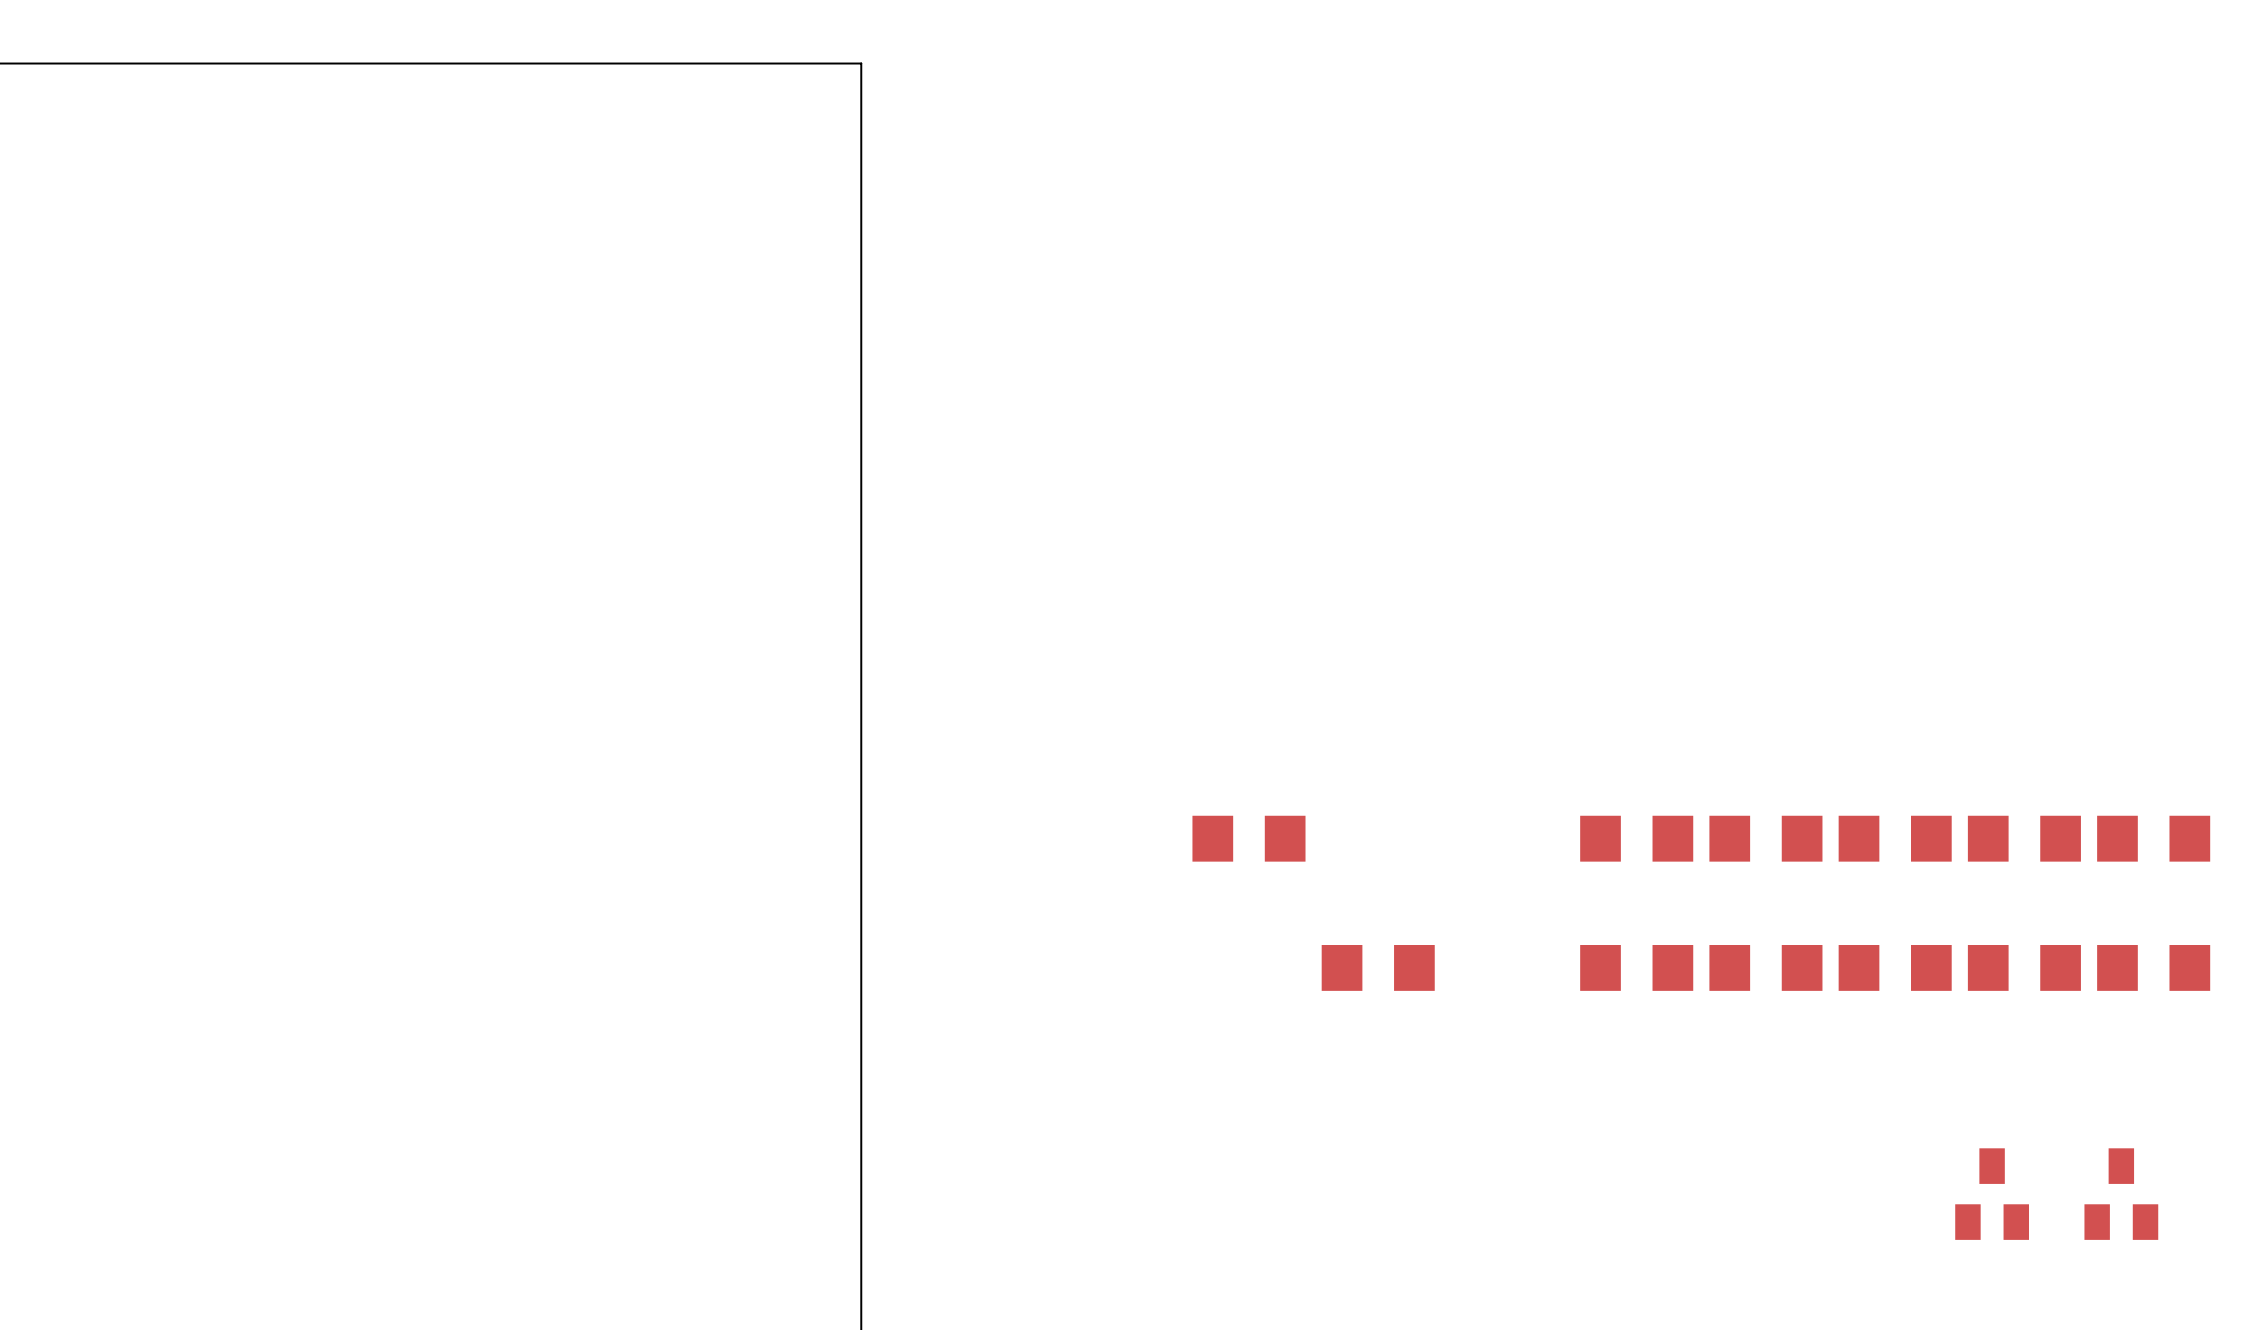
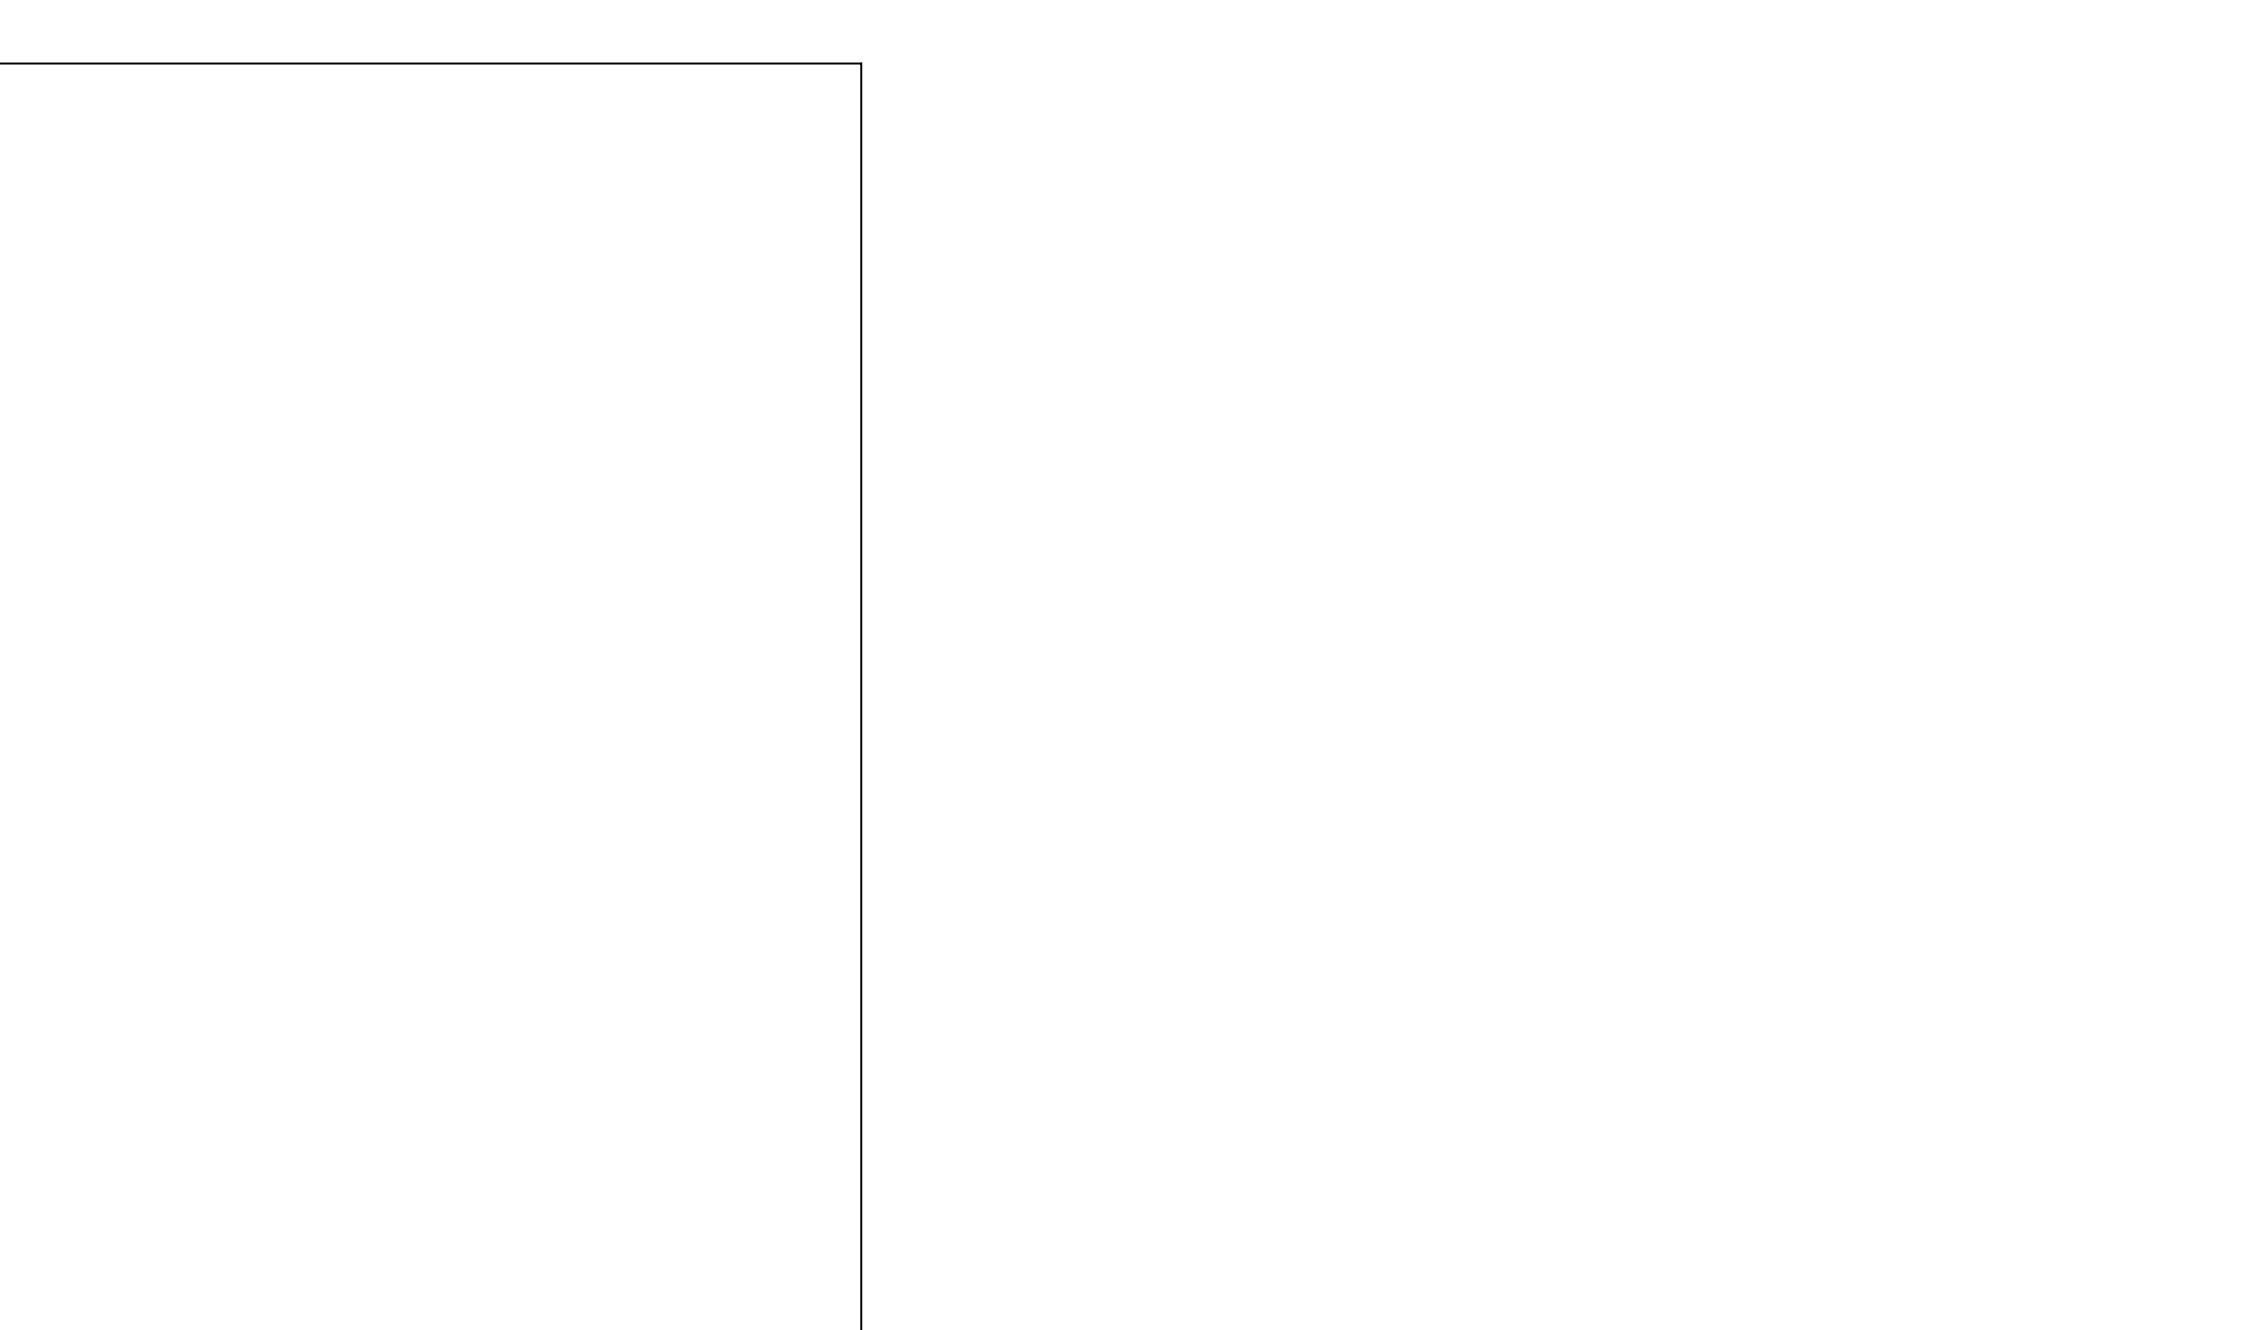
part: (1248, 838) -> none
part: (1636, 838) -> none
part: (1765, 838) -> none
part: (1895, 838) -> none
part: (2024, 838) -> none
part: (2153, 838) -> none
part: (1378, 967) -> none
part: (1636, 967) -> none
part: (1765, 967) -> none
part: (1895, 967) -> none
part: (2024, 967) -> none
part: (2153, 967) -> none
part: (1992, 1194) -> none
part: (2121, 1194) -> none

